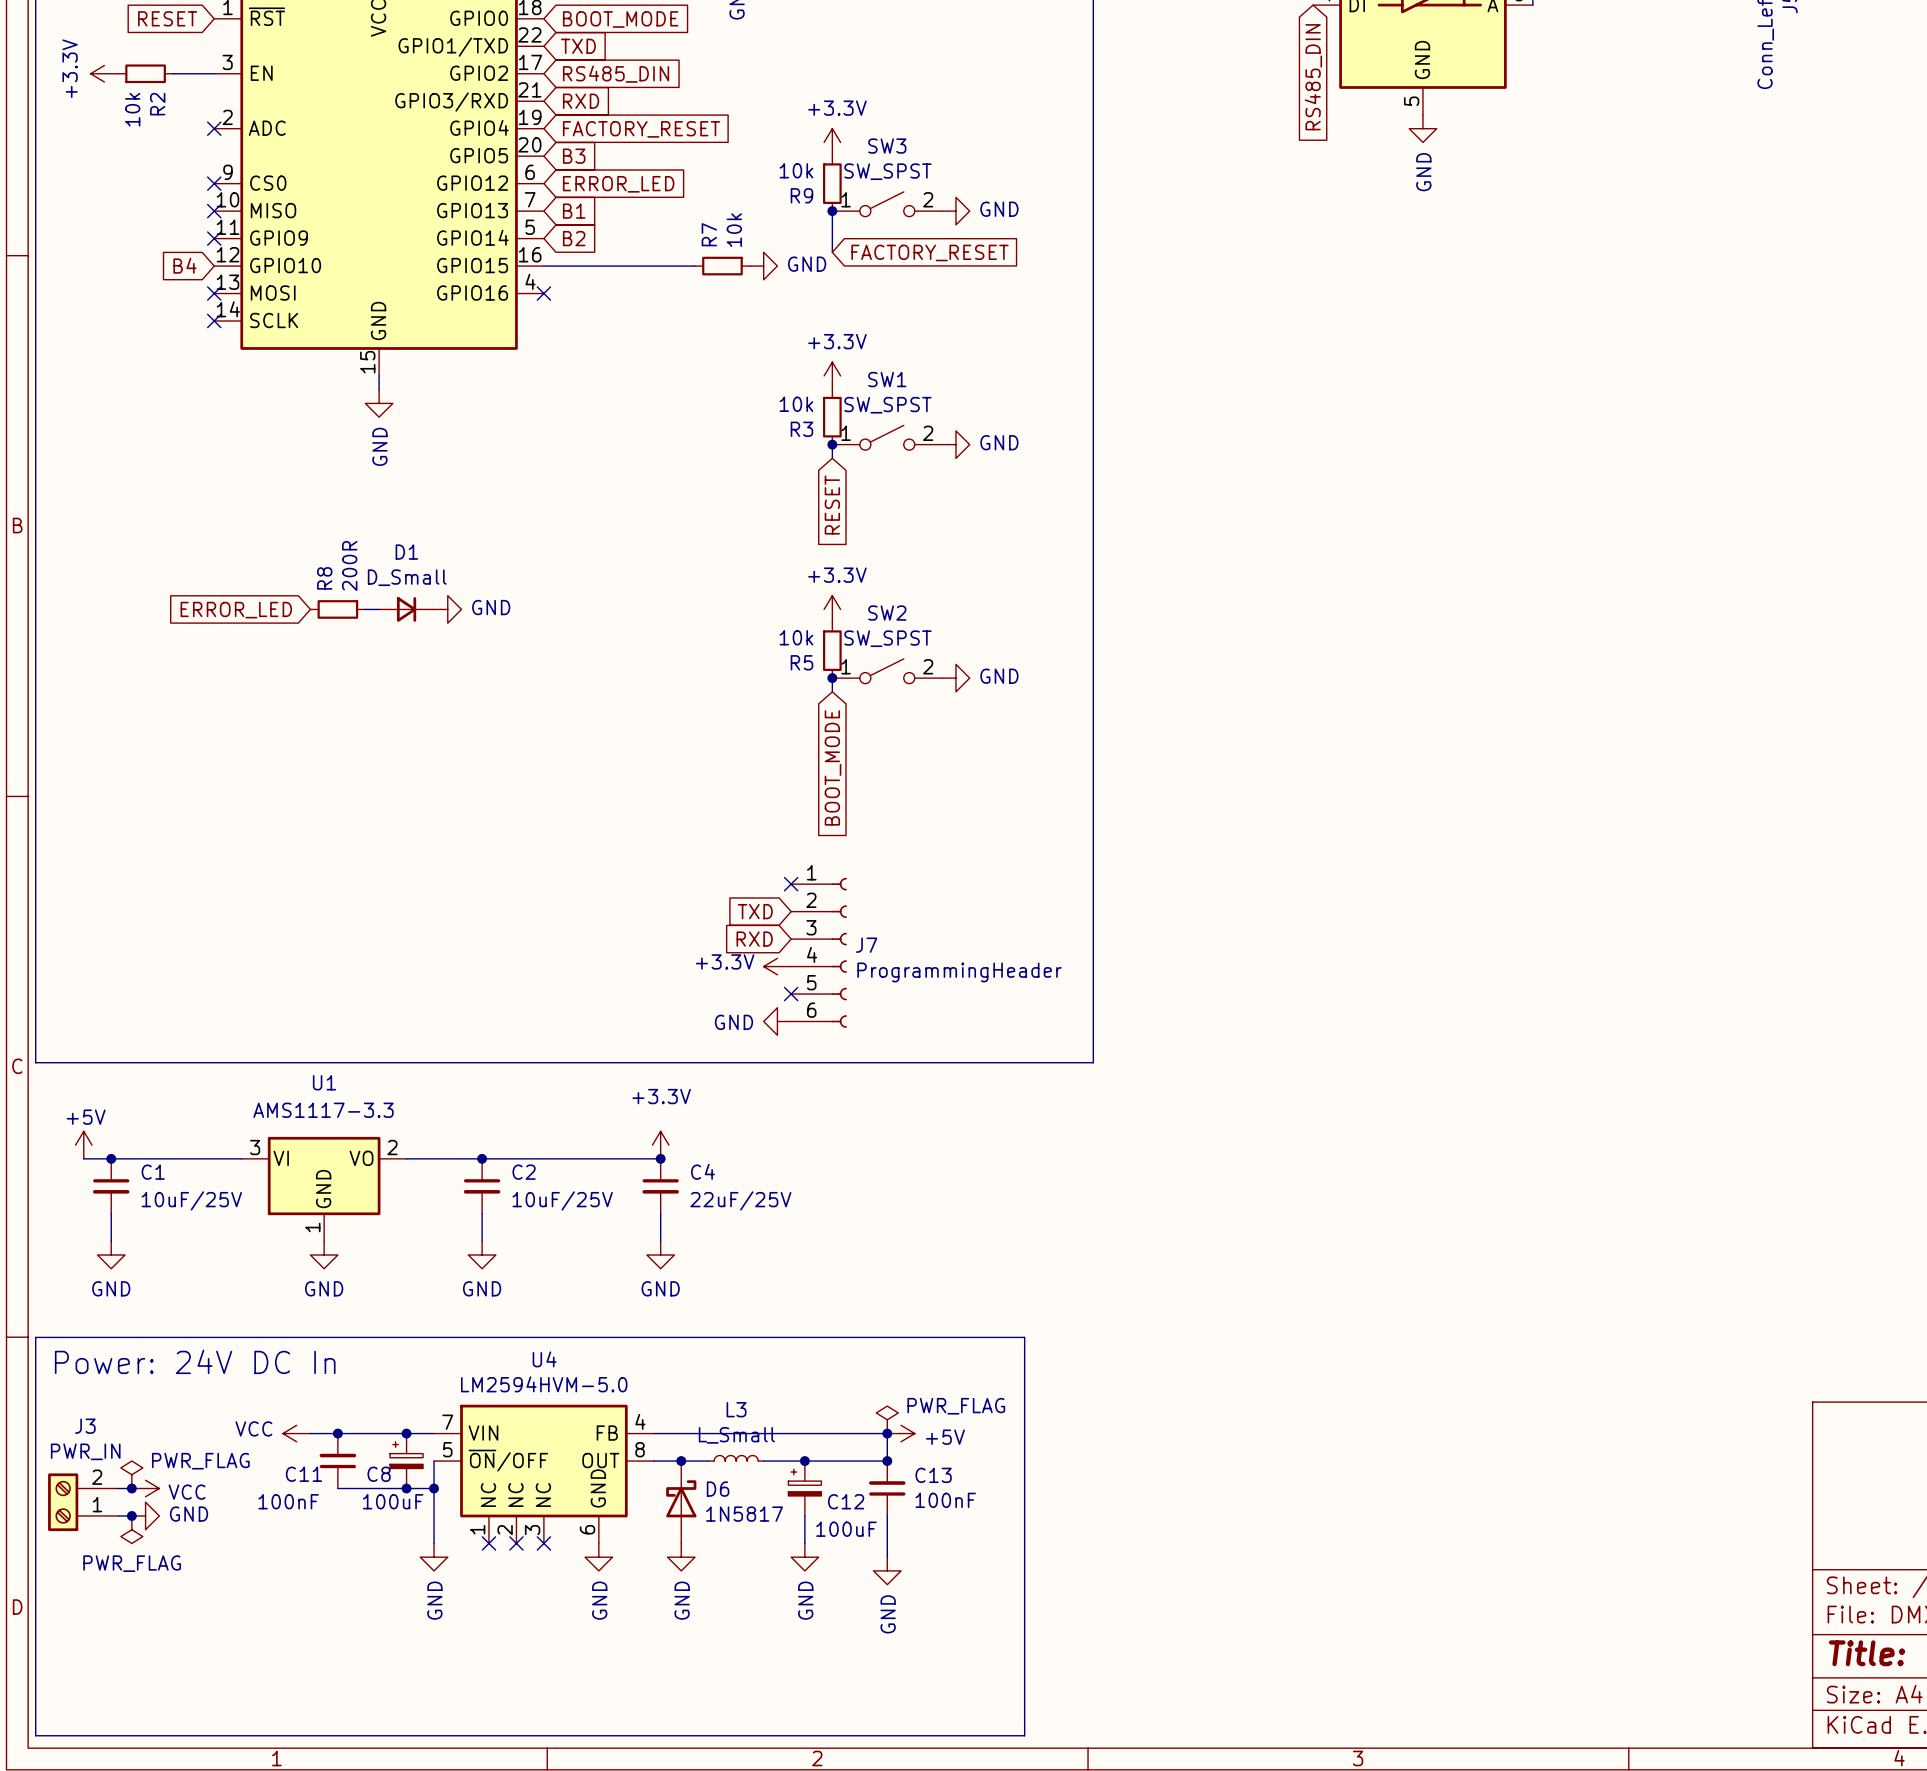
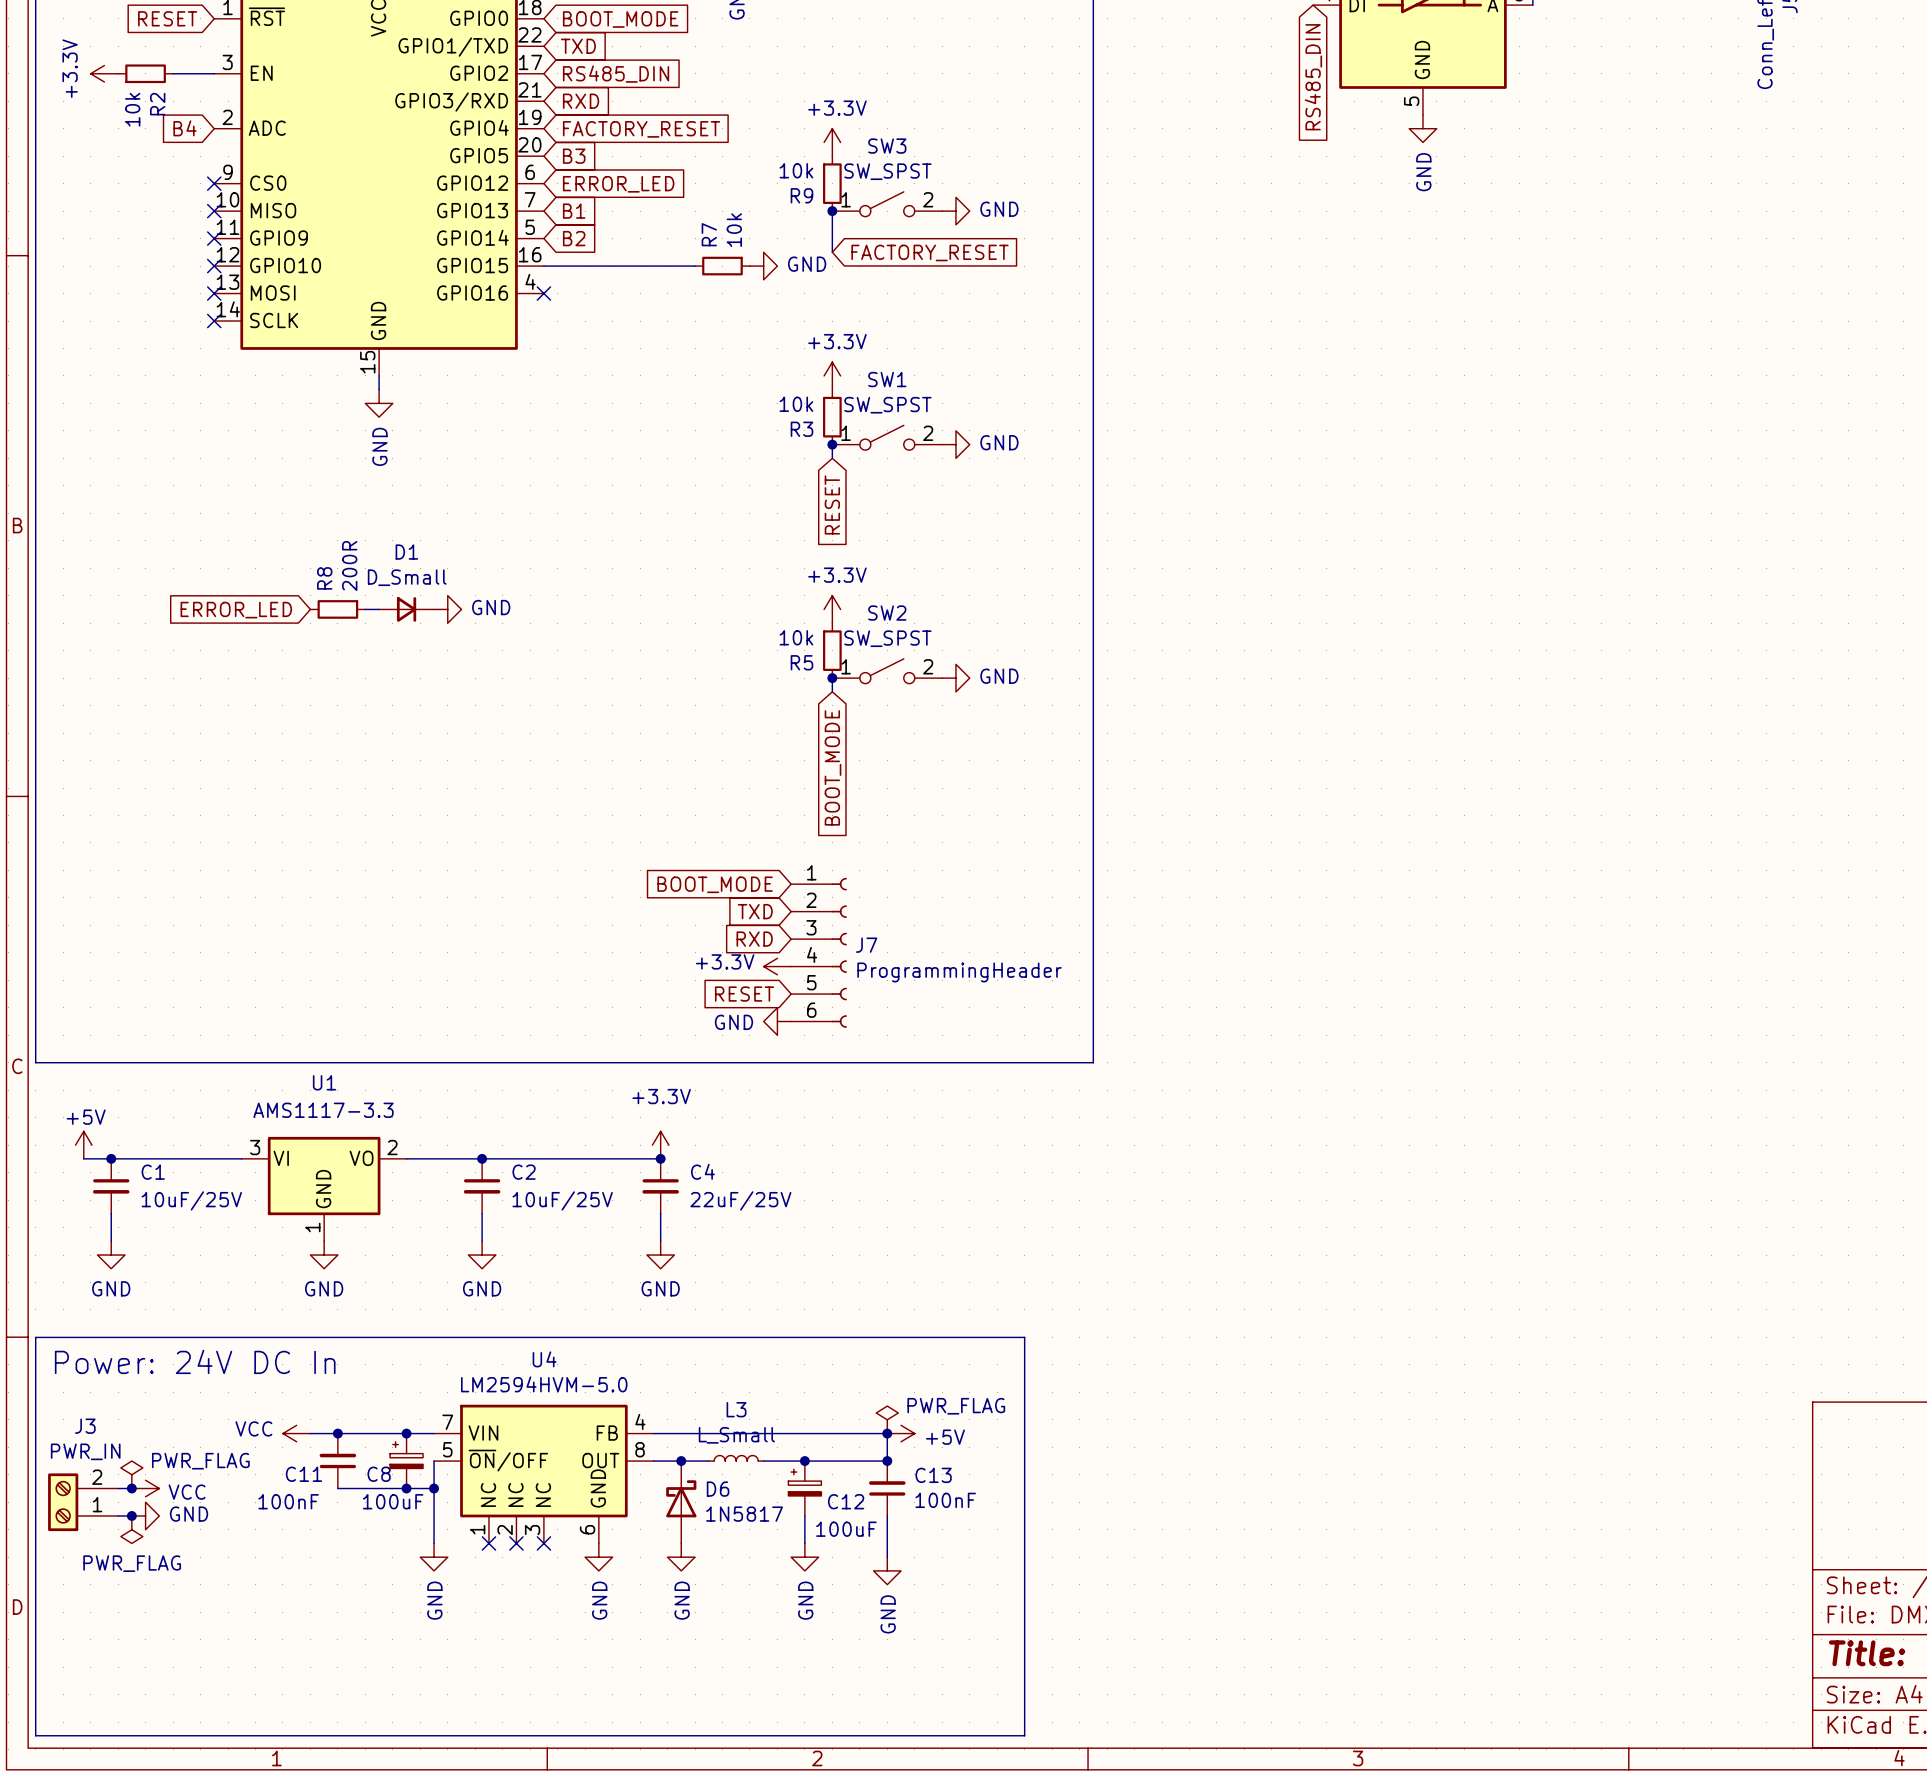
no-connect mark: (214, 128) -> none
global label position: B4 (184, 265) -> B4 (184, 128)
no-connect mark: none -> (214, 266)
global label: none -> BOOT_MODE (715, 884)
no-connect mark: (791, 884) -> none
global label: none -> RESET (744, 994)
no-connect mark: (791, 994) -> none

